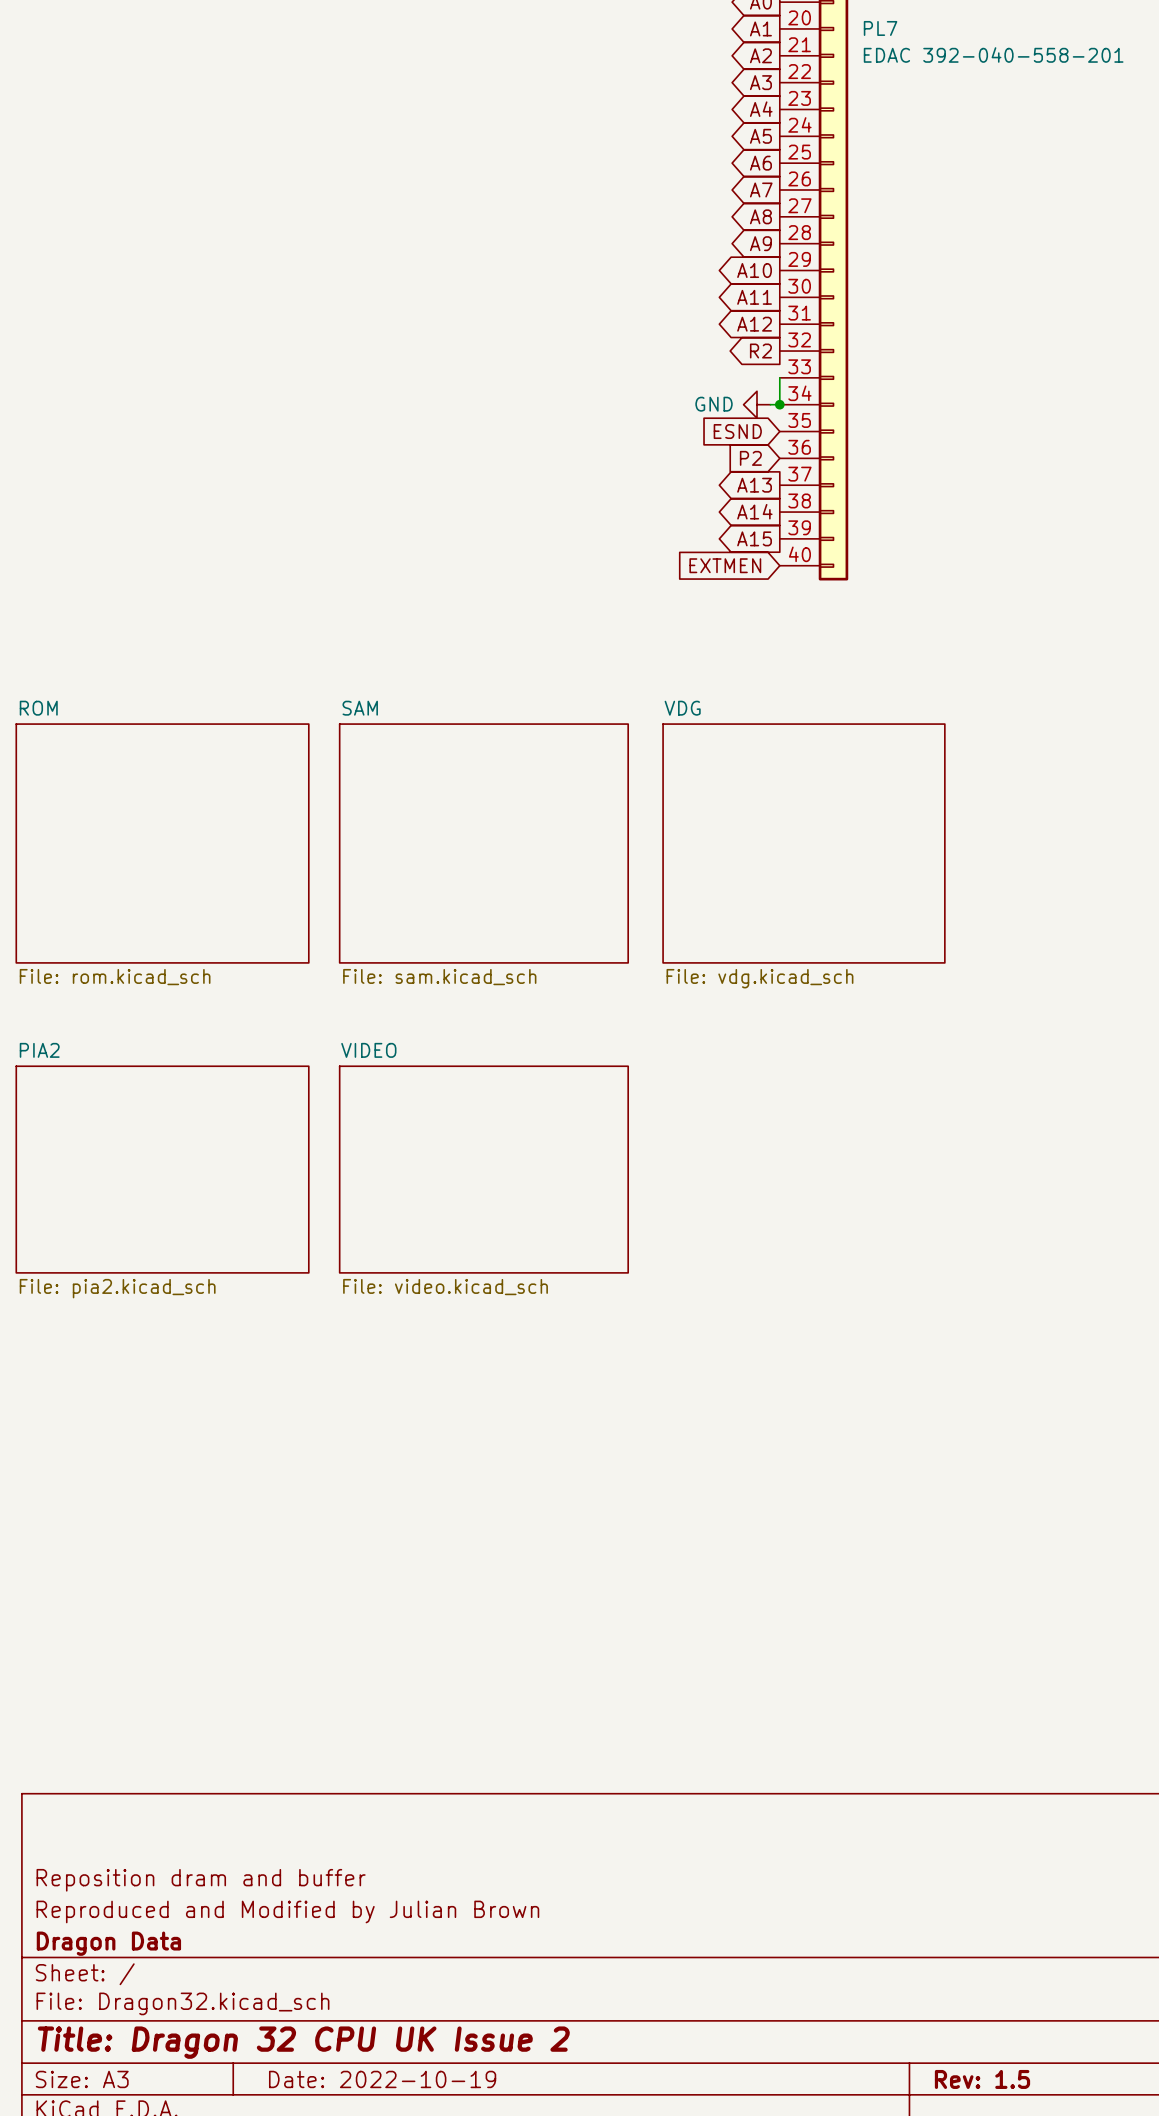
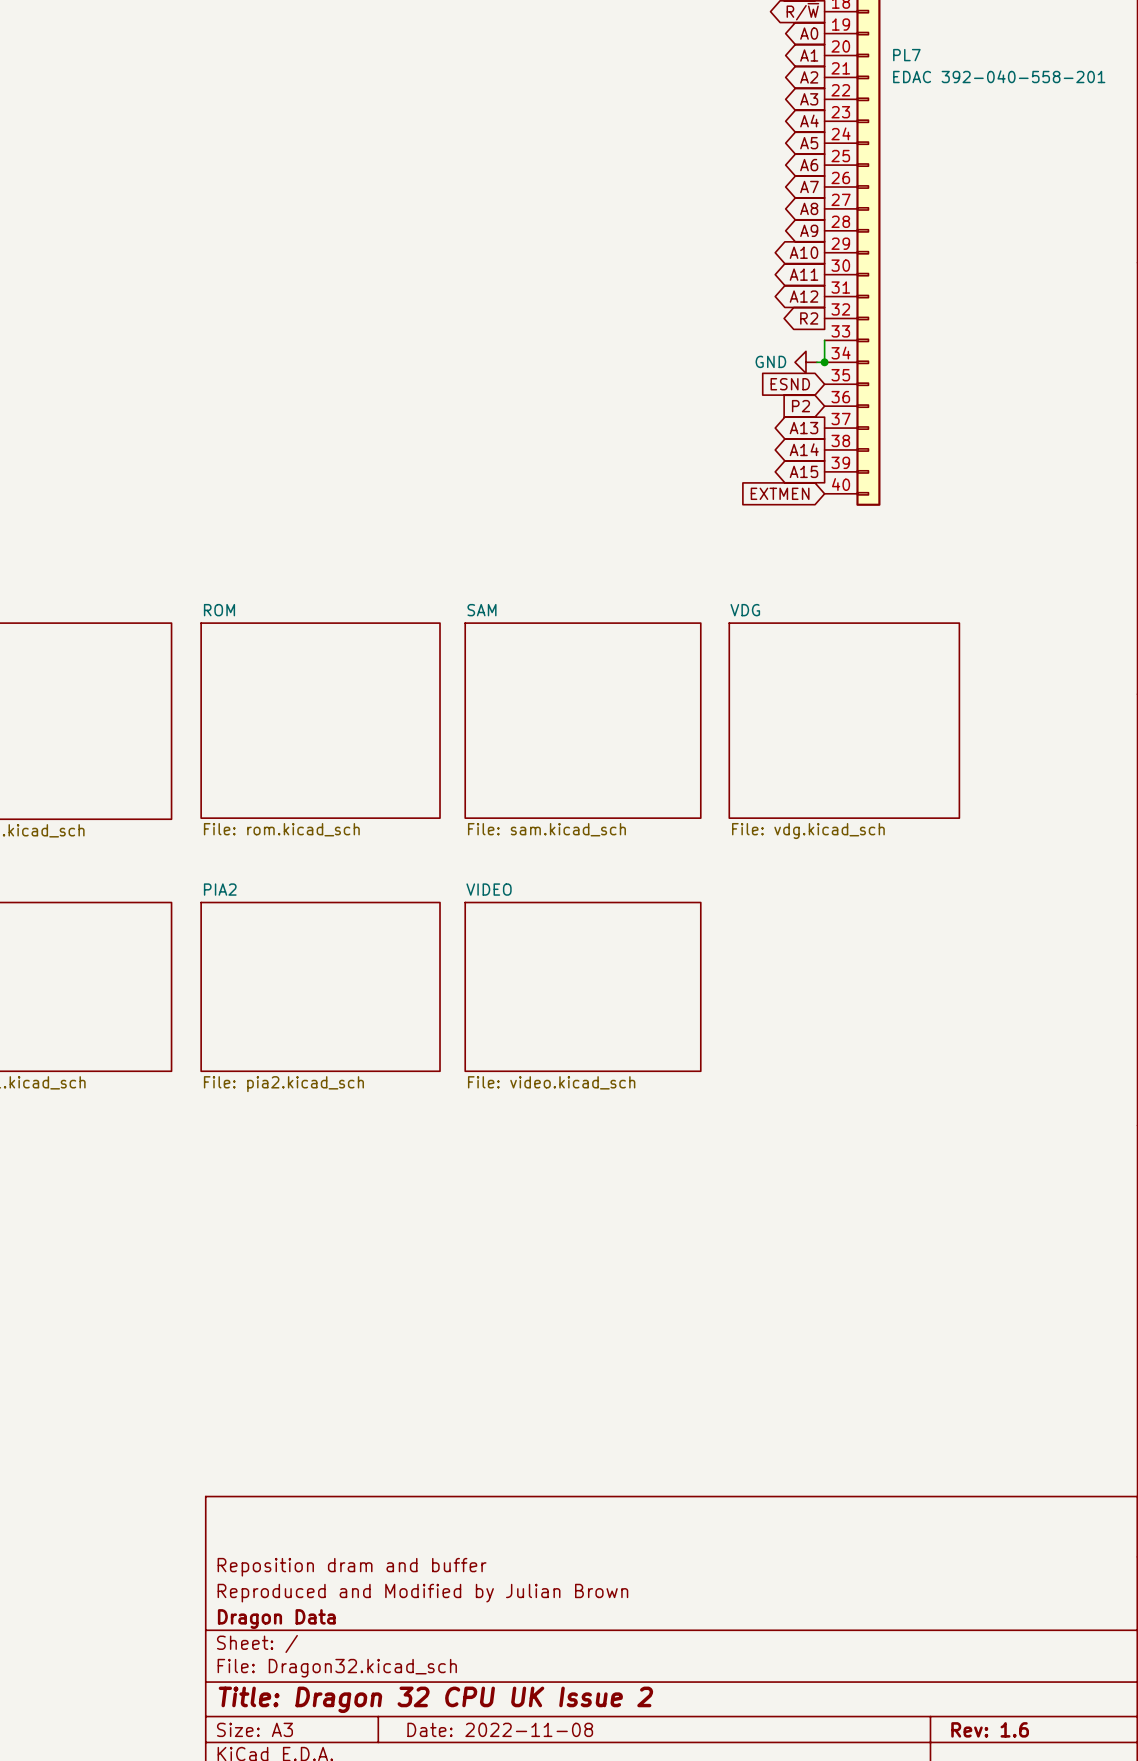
title block: Date: 2022-10-19 (382, 2079) -> Date: 2022-11-08 (500, 1729)
title block: Rev: 1.5 (982, 2079) -> Rev: 1.6 (990, 1729)

